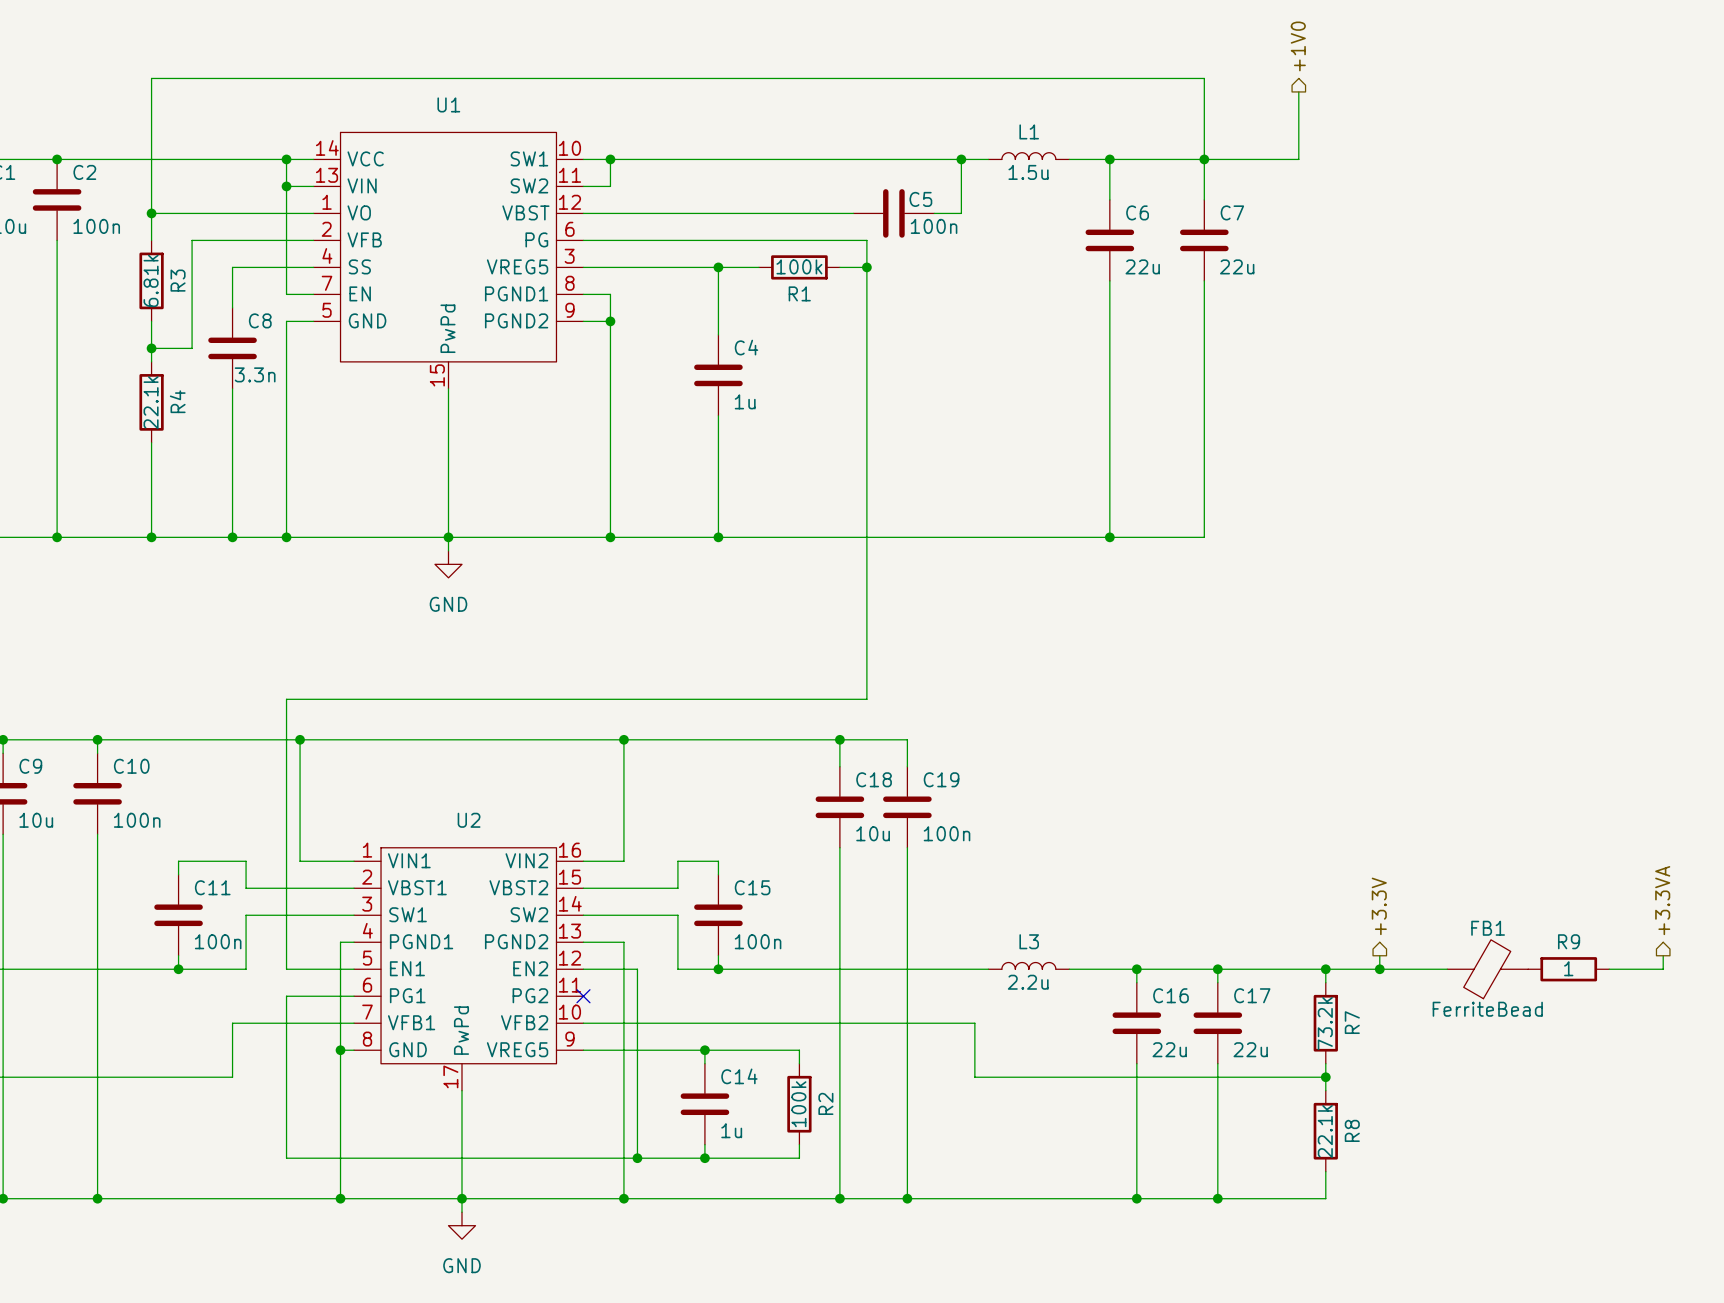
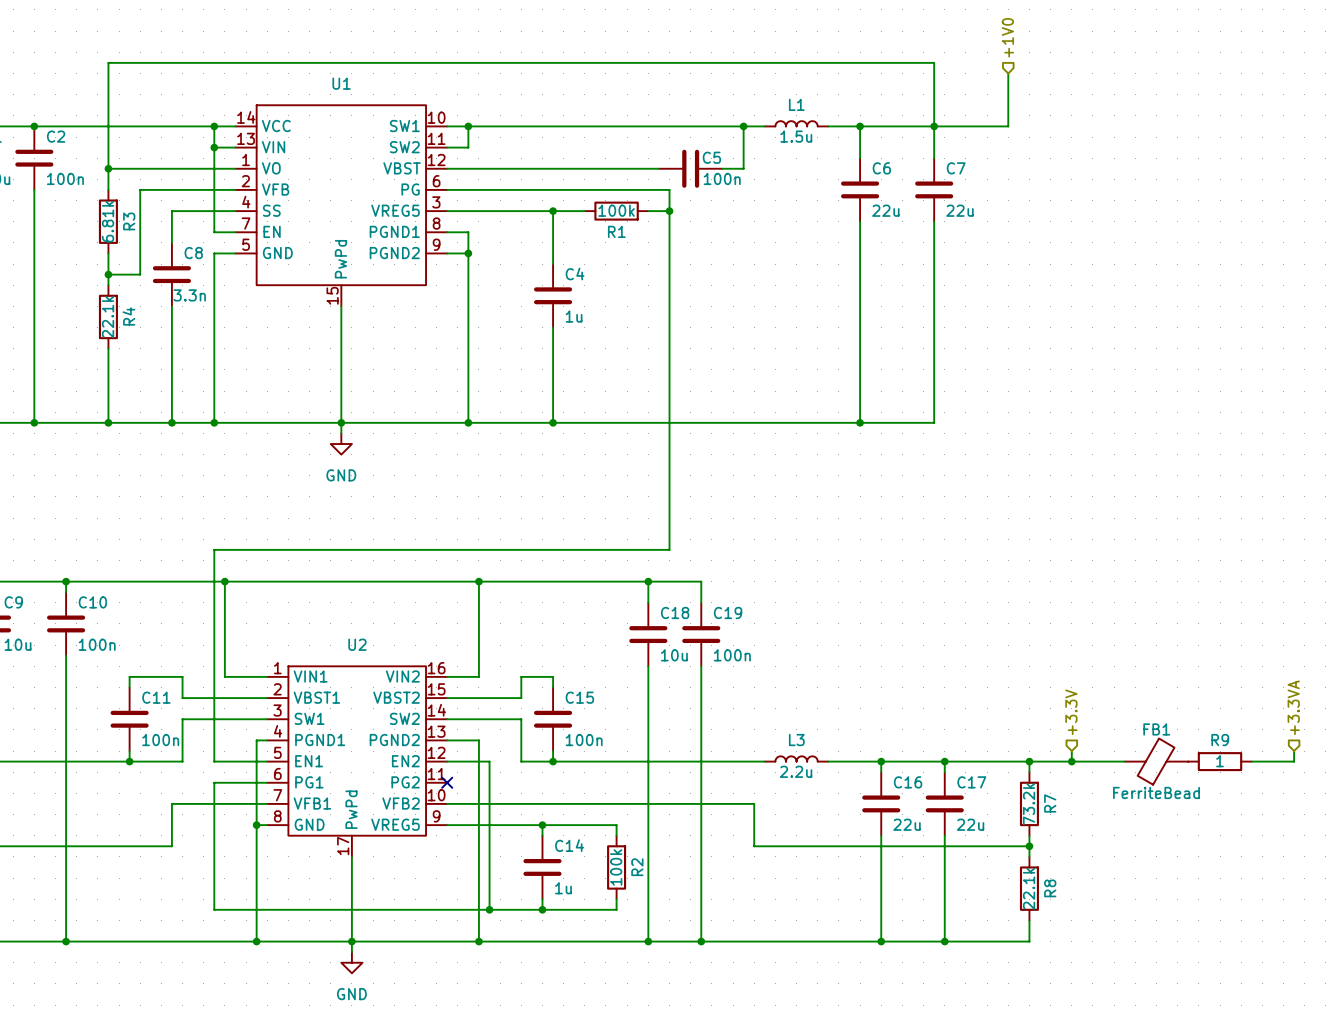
hierarchical label shape: output (1298, 46) -> input (1007, 37)
hierarchical label shape: output (1662, 900) -> input (1293, 707)
hierarchical label shape: output (1379, 906) -> input (1071, 712)

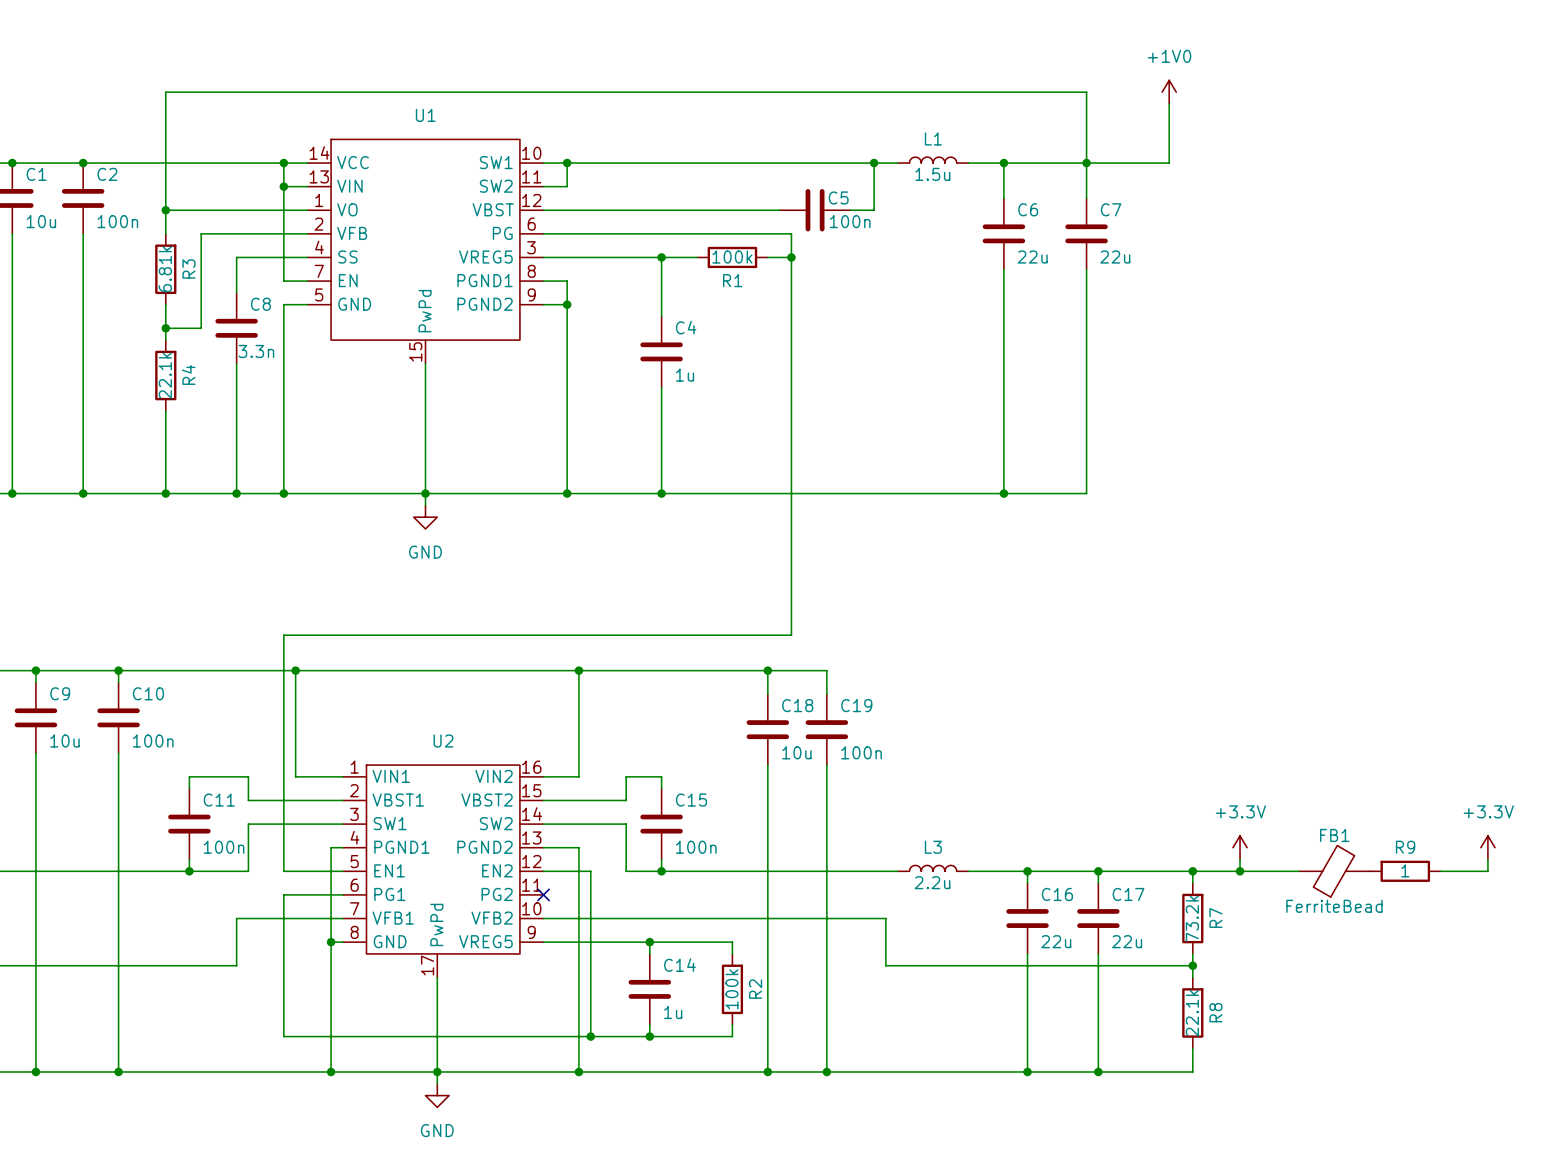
hierarchical label: +1V0 (1007, 37) -> none
power symbol: none -> +1V0 (1169, 92)
hierarchical label: +3.3VA (1293, 707) -> none
hierarchical label: +3.3V (1071, 712) -> none
power symbol: none -> +3.3V (1240, 847)
power symbol: none -> +3.3V (1487, 847)

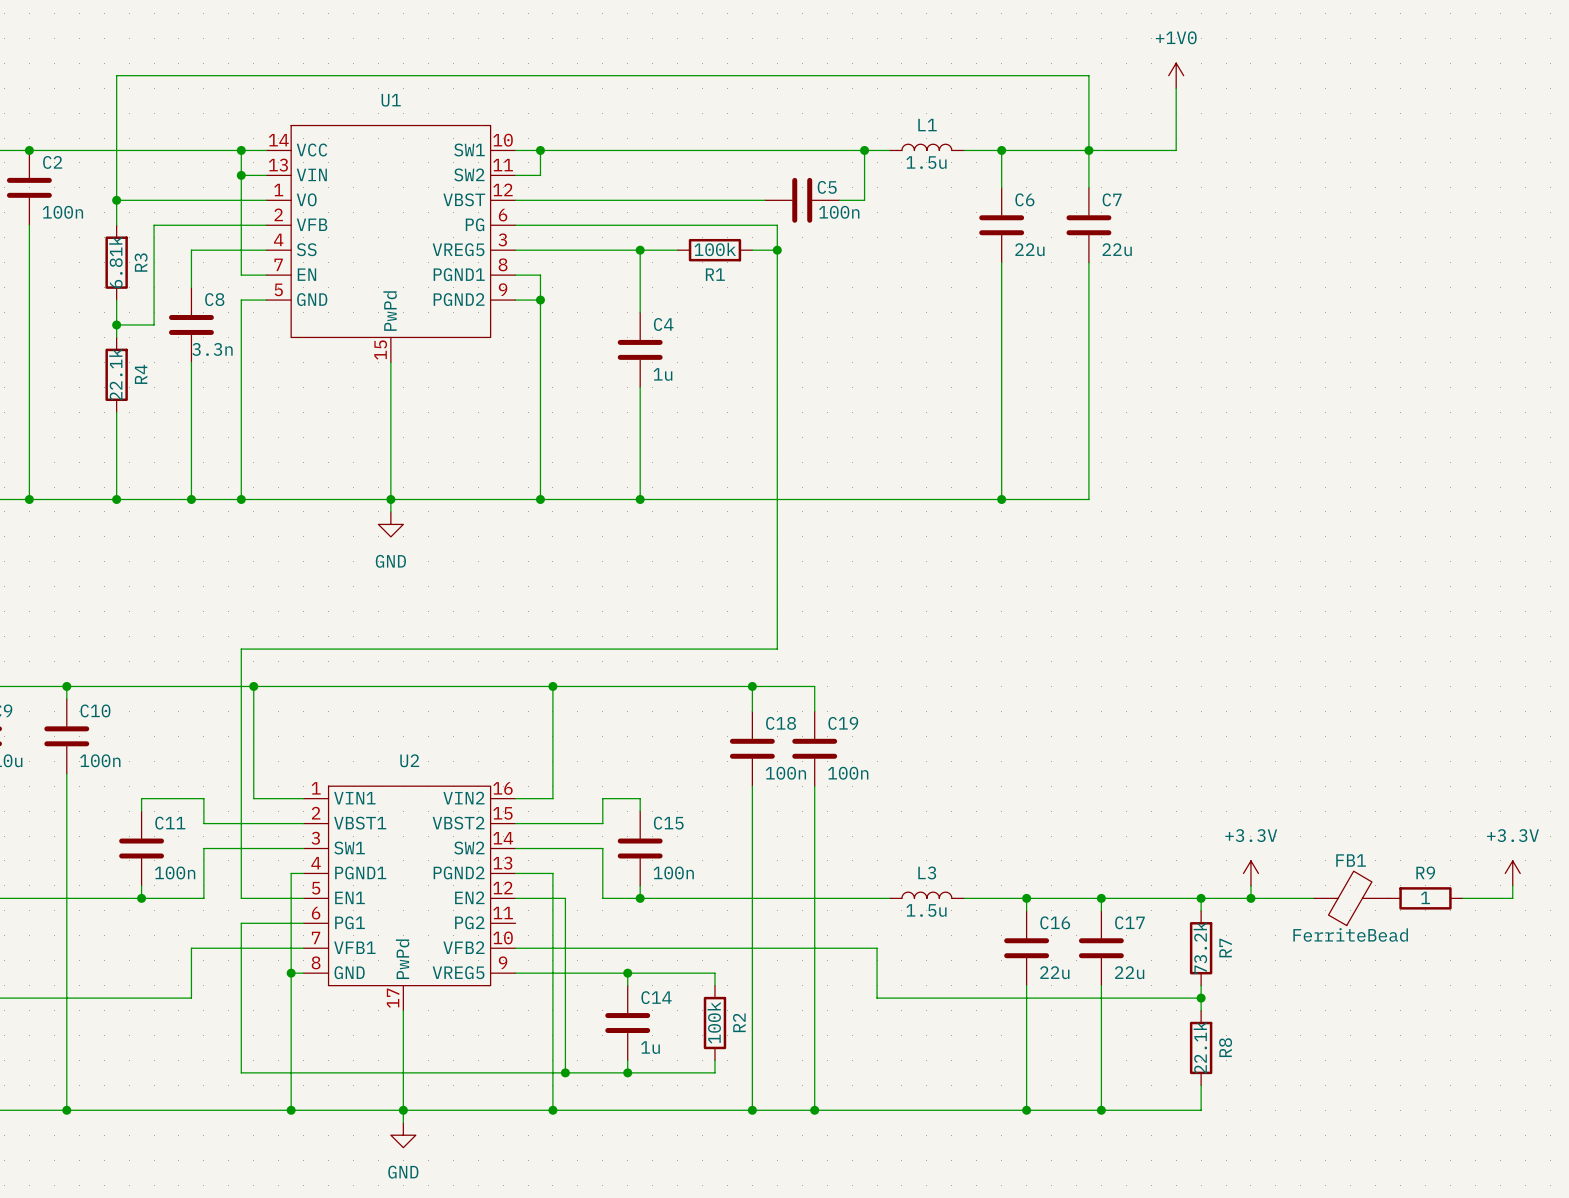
C18 value: 10u (796, 752) -> 100n (785, 773)
L3 value: 2.2u (932, 882) -> 1.5u (926, 910)
no-connect mark: (543, 894) -> none

